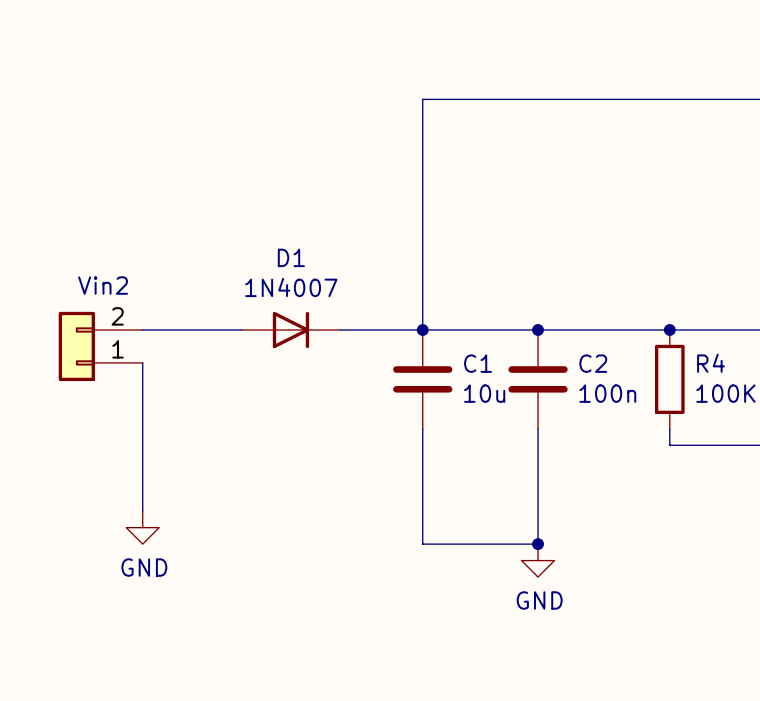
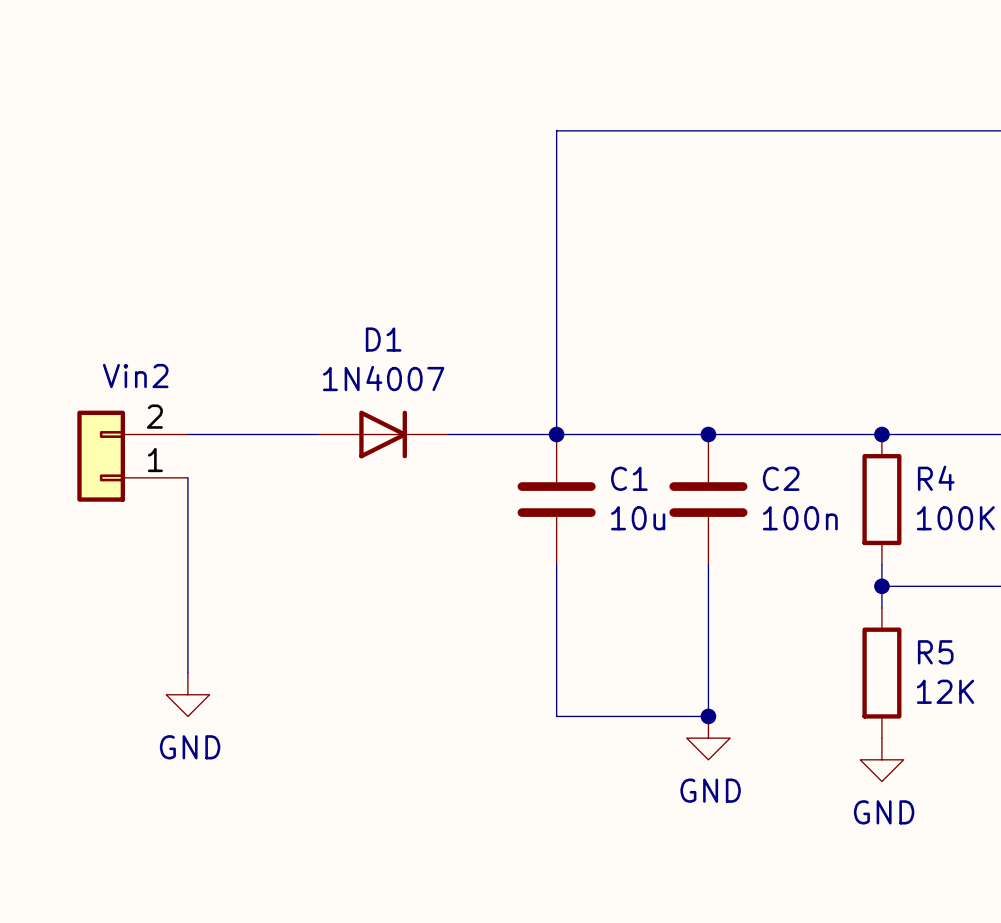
wire: none -> (881, 586) (881, 608)
junction: none -> (881, 586)
R5: none -> 12K (881, 673)
power symbol: none -> GND (881, 759)

